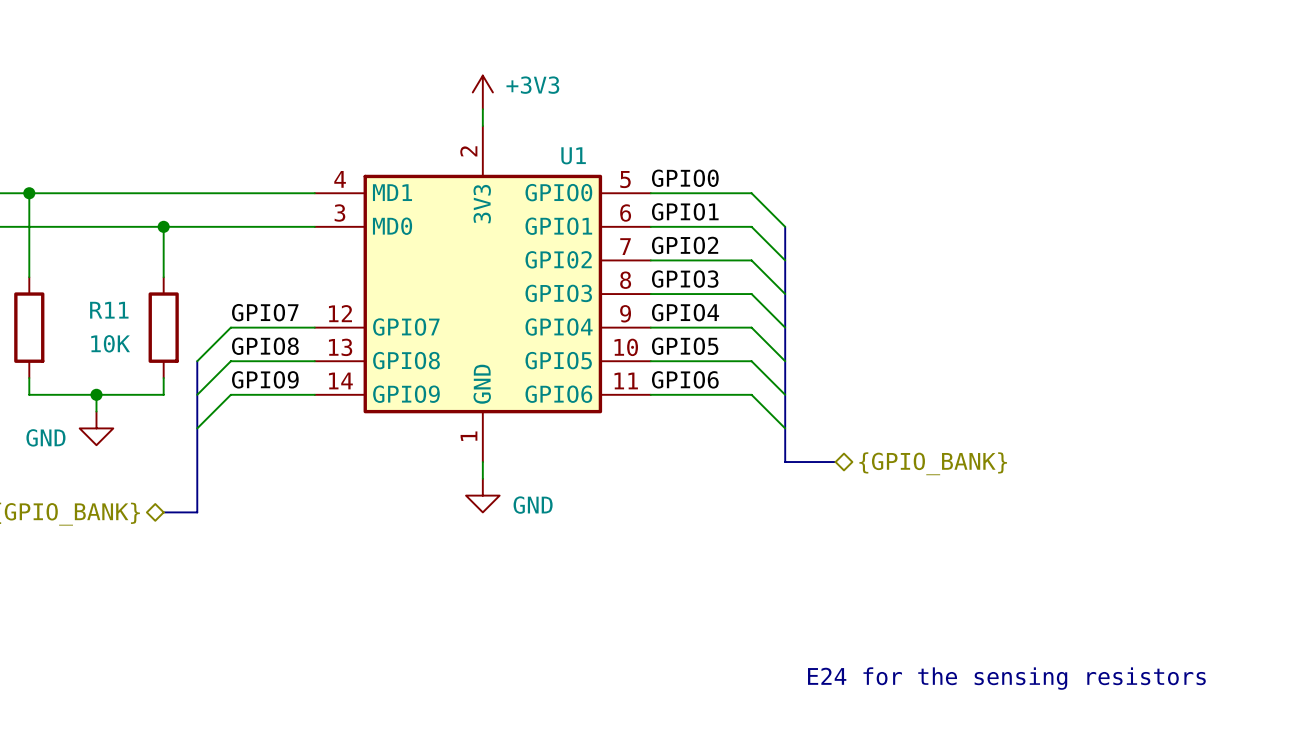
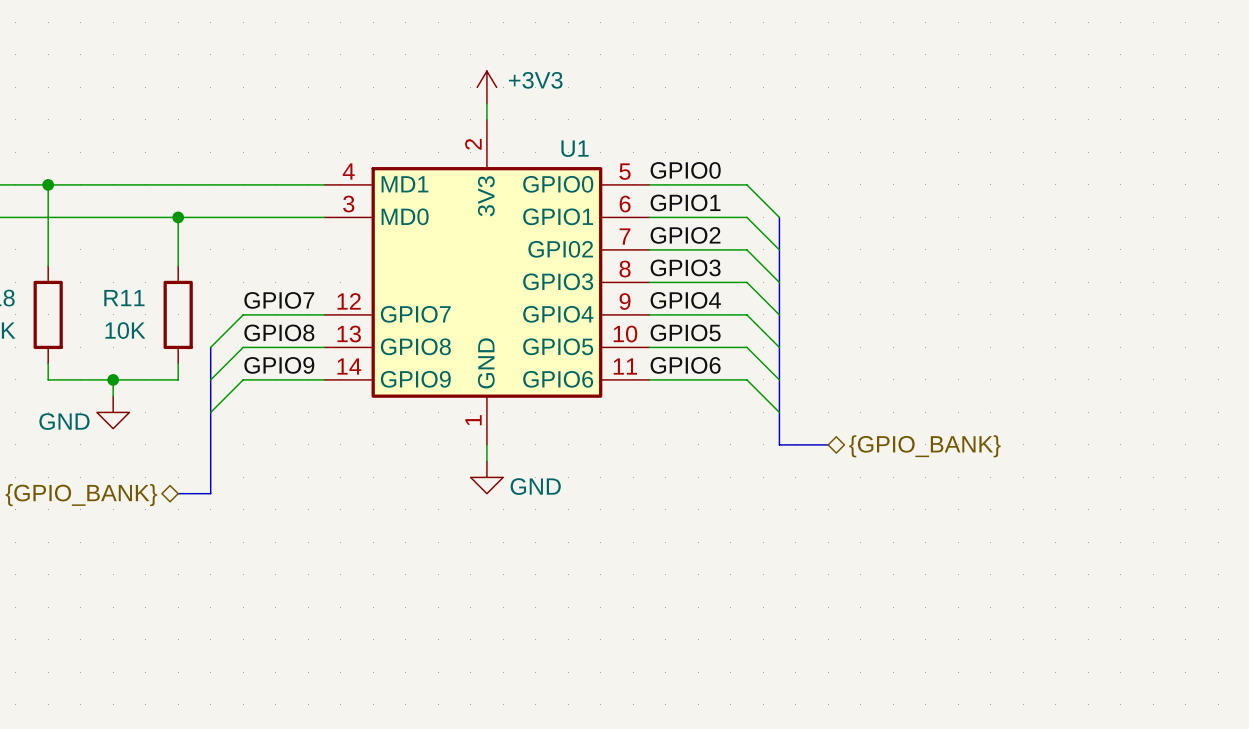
text: E24 for the sensing resistors (1006, 678) -> none

